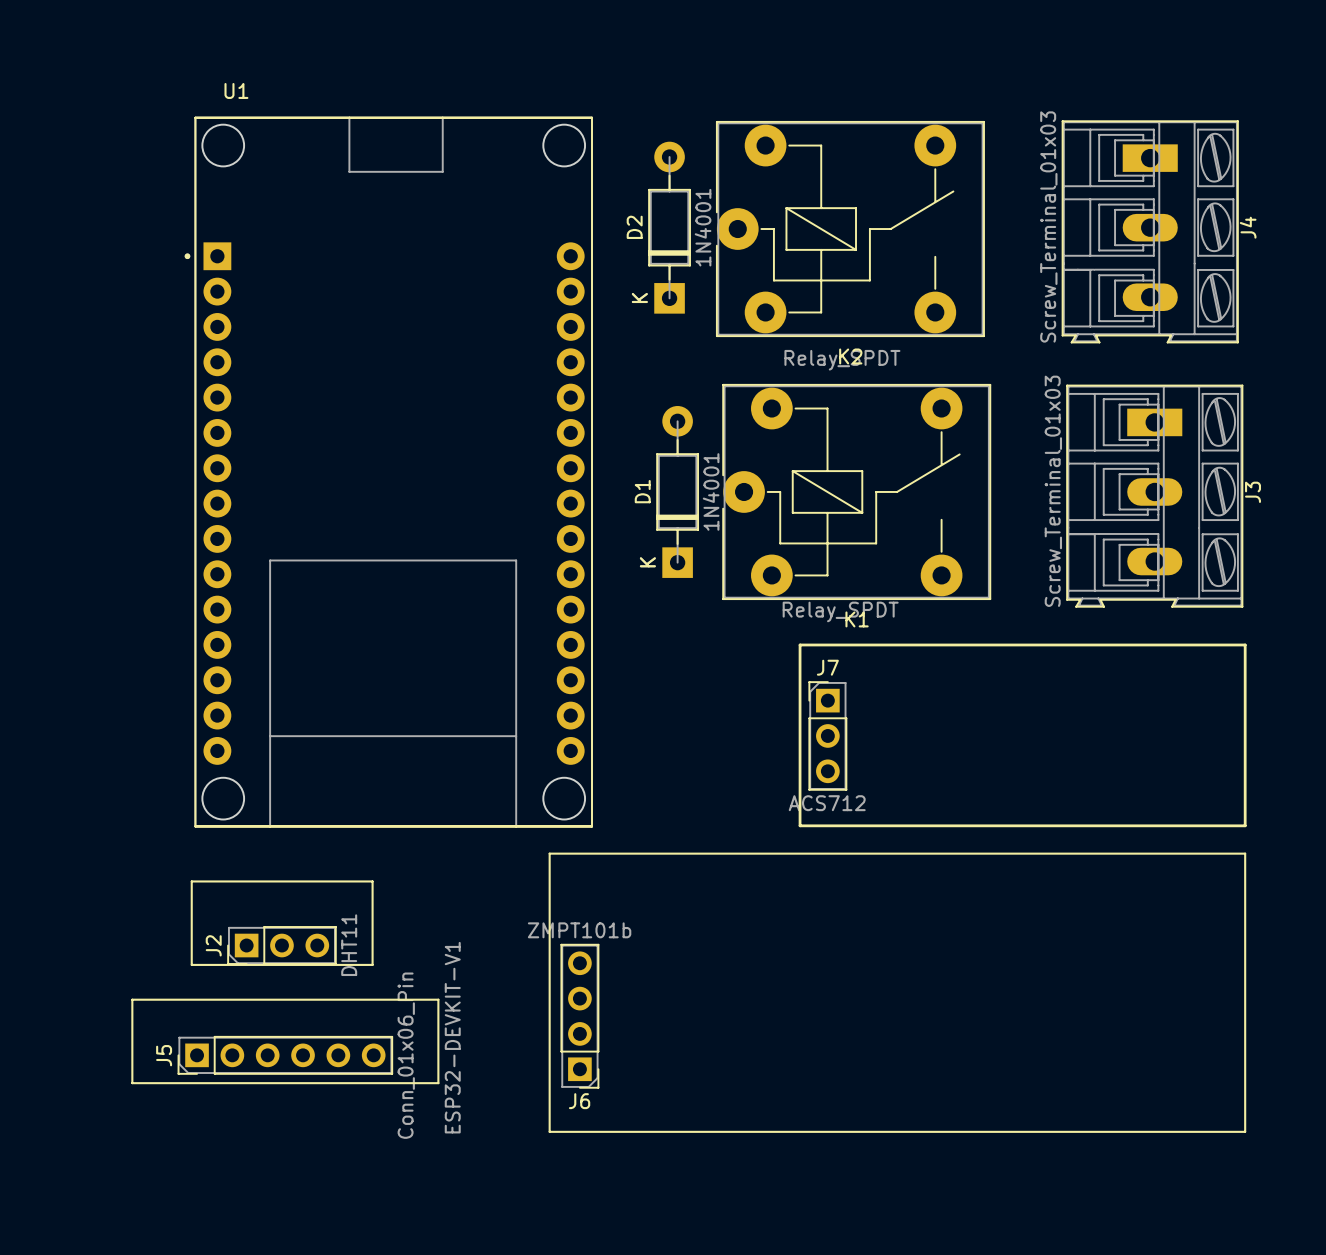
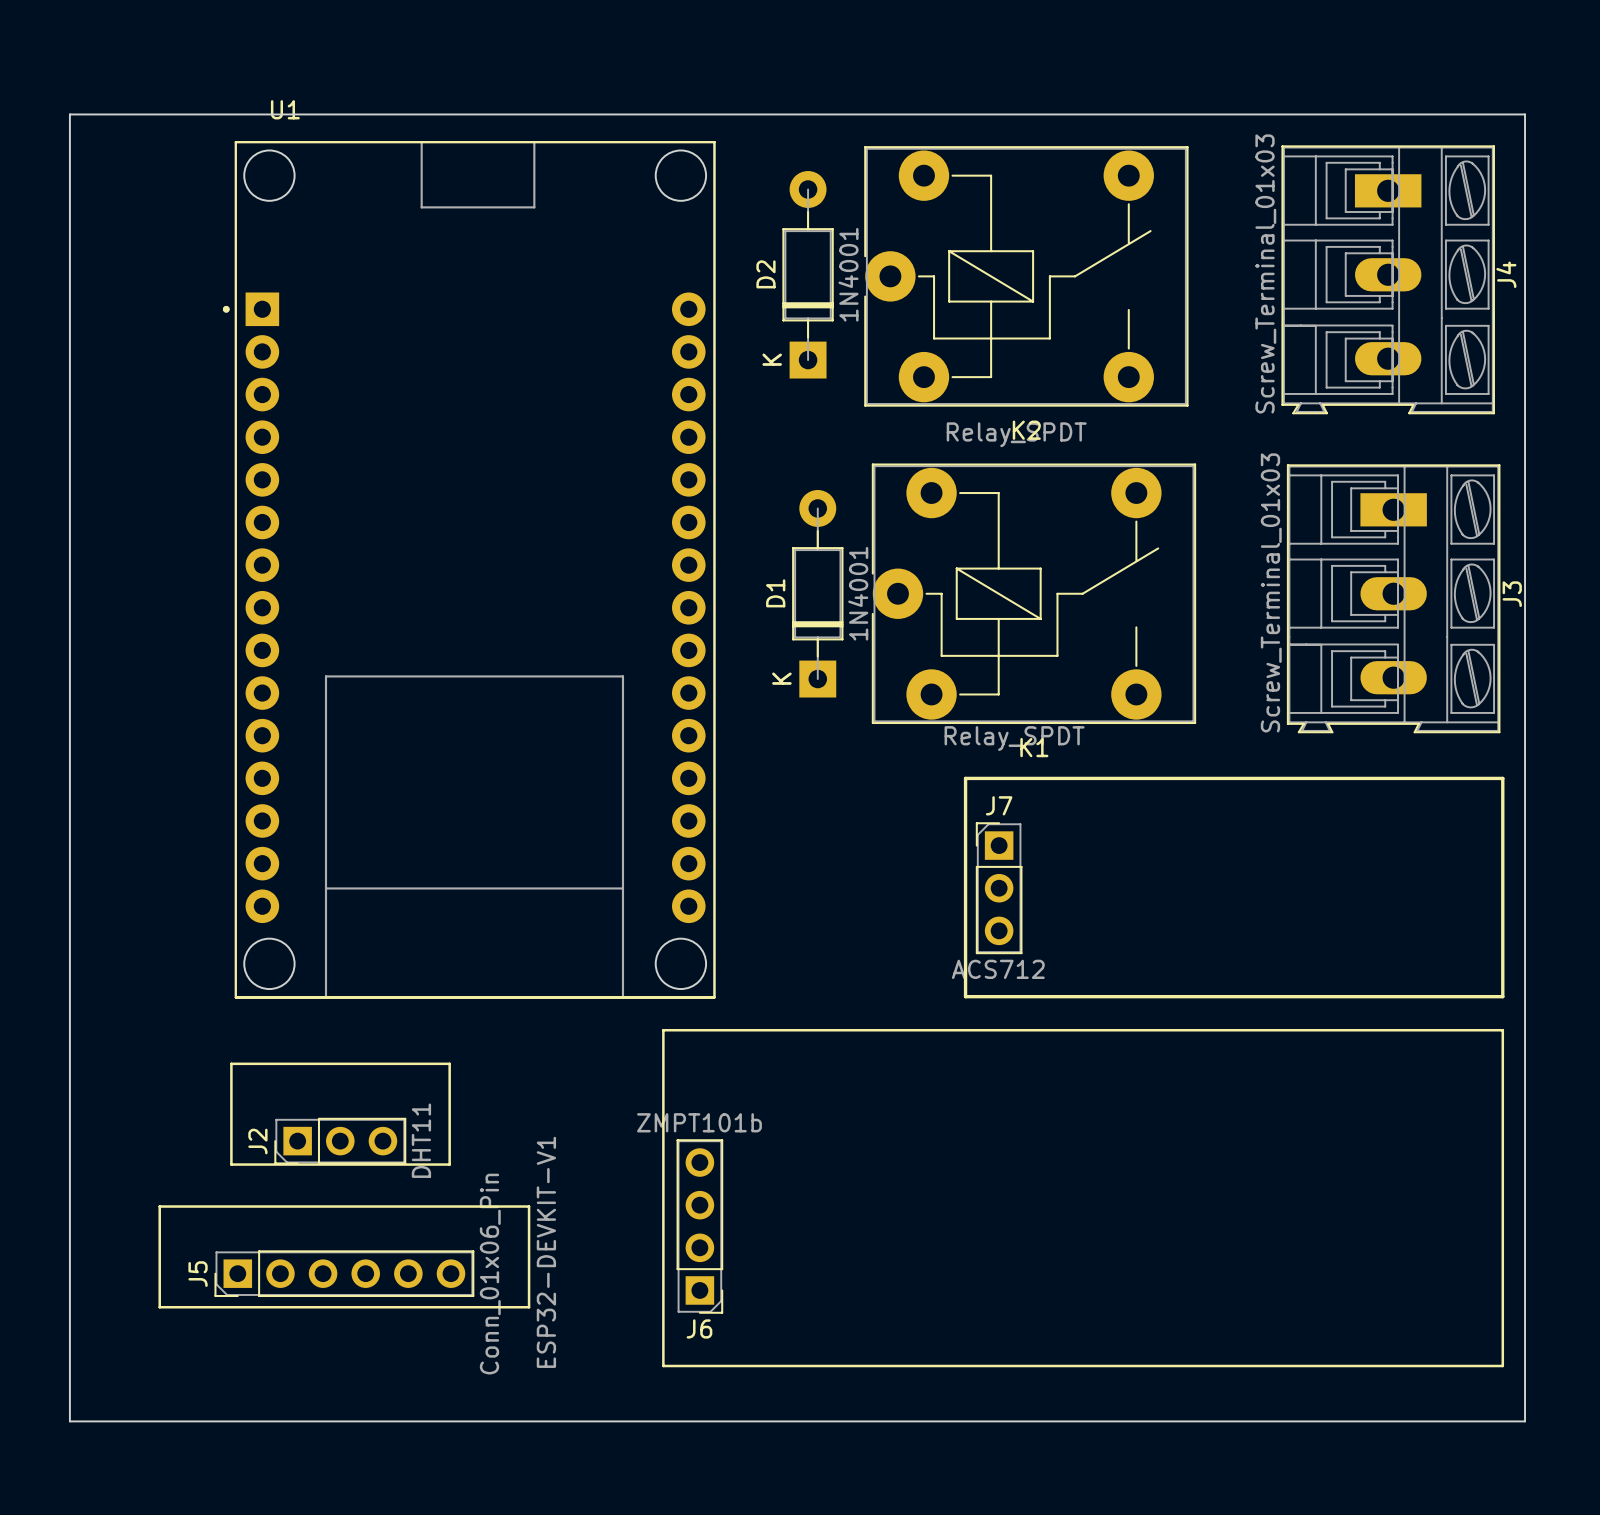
board edge: none -> (69, 114) (1525, 114) (1525, 1421) (69, 1421) (69, 114)

